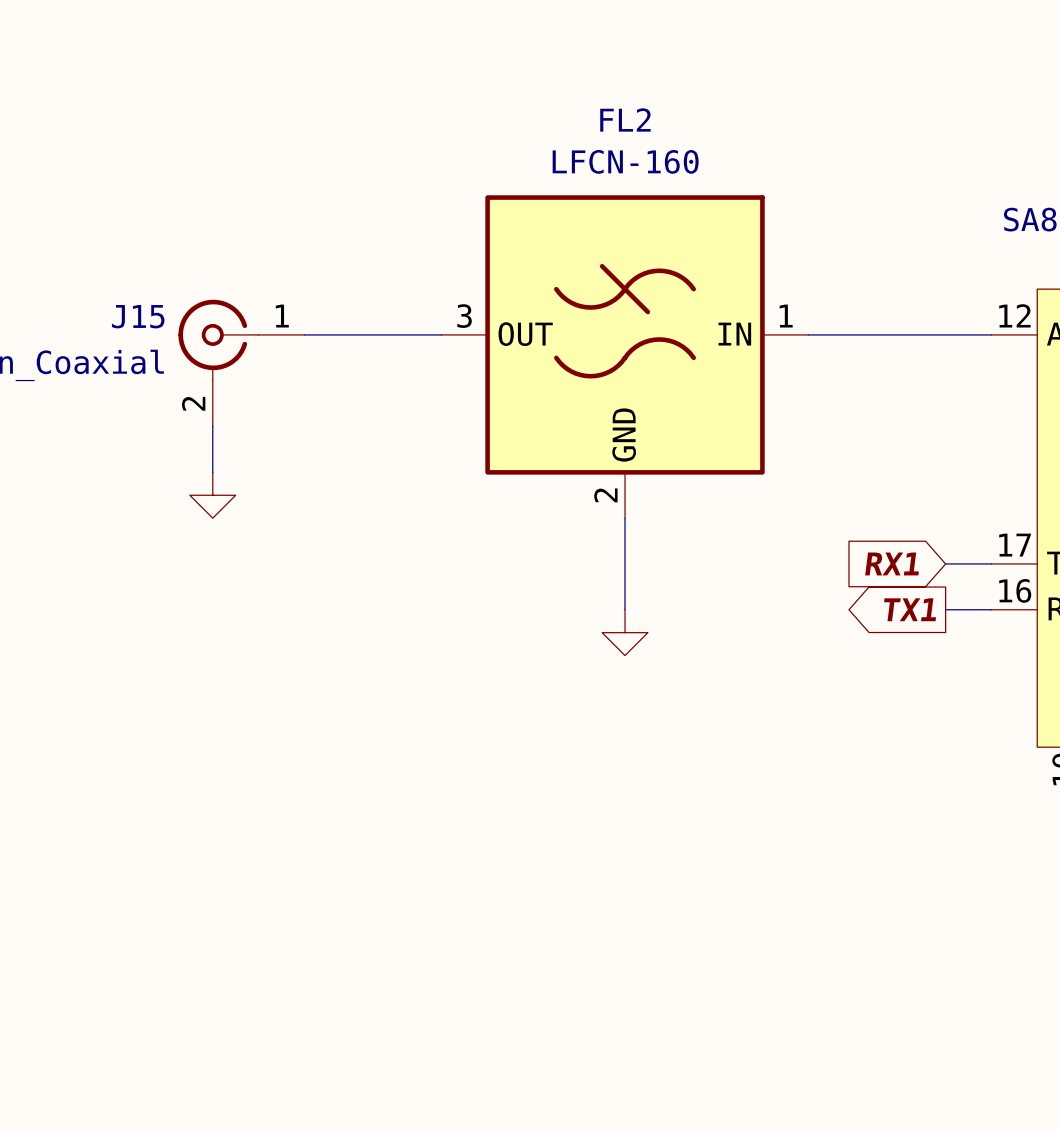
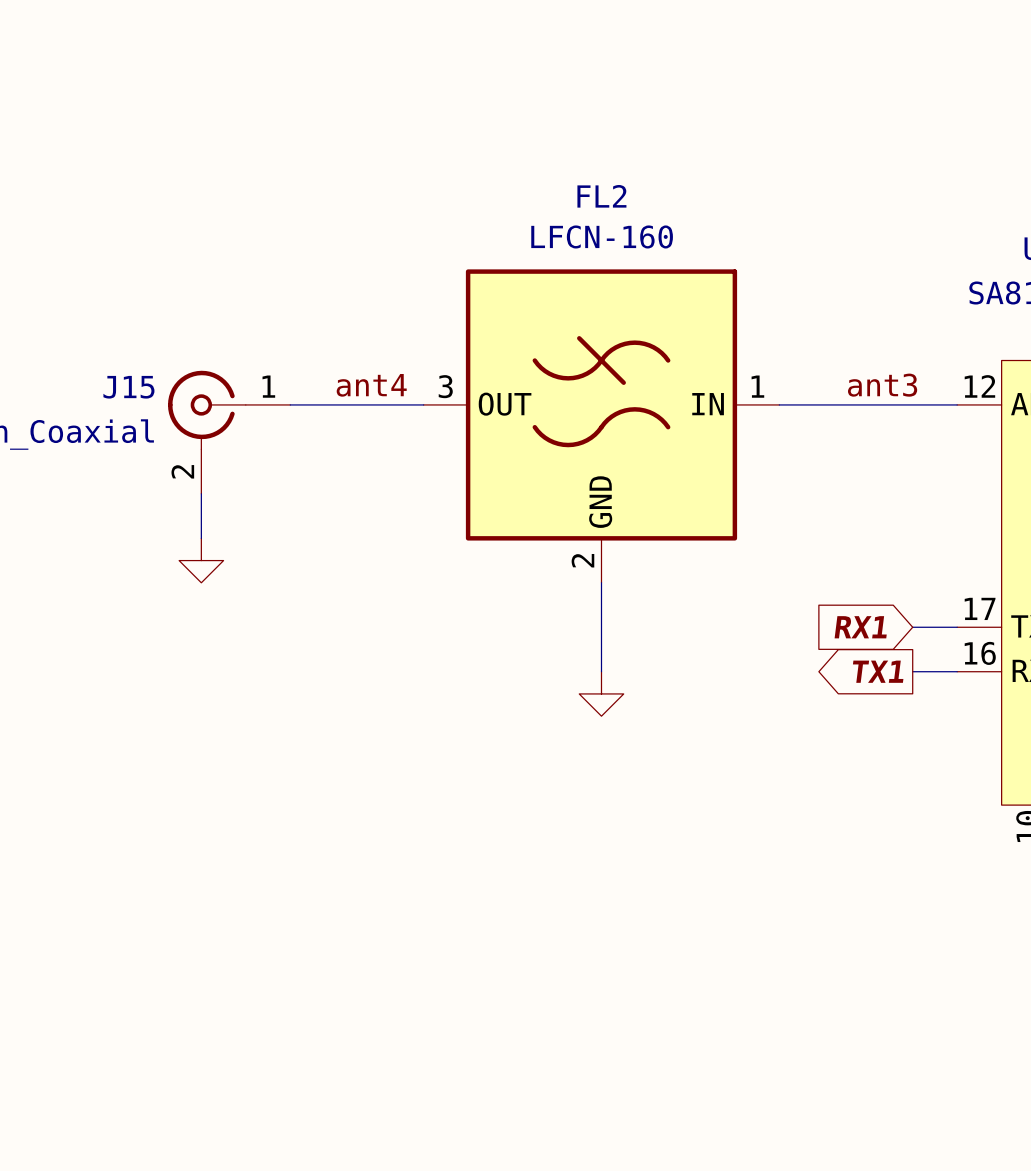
label: none -> ant4 (371, 385)
label: none -> ant3 (882, 385)

